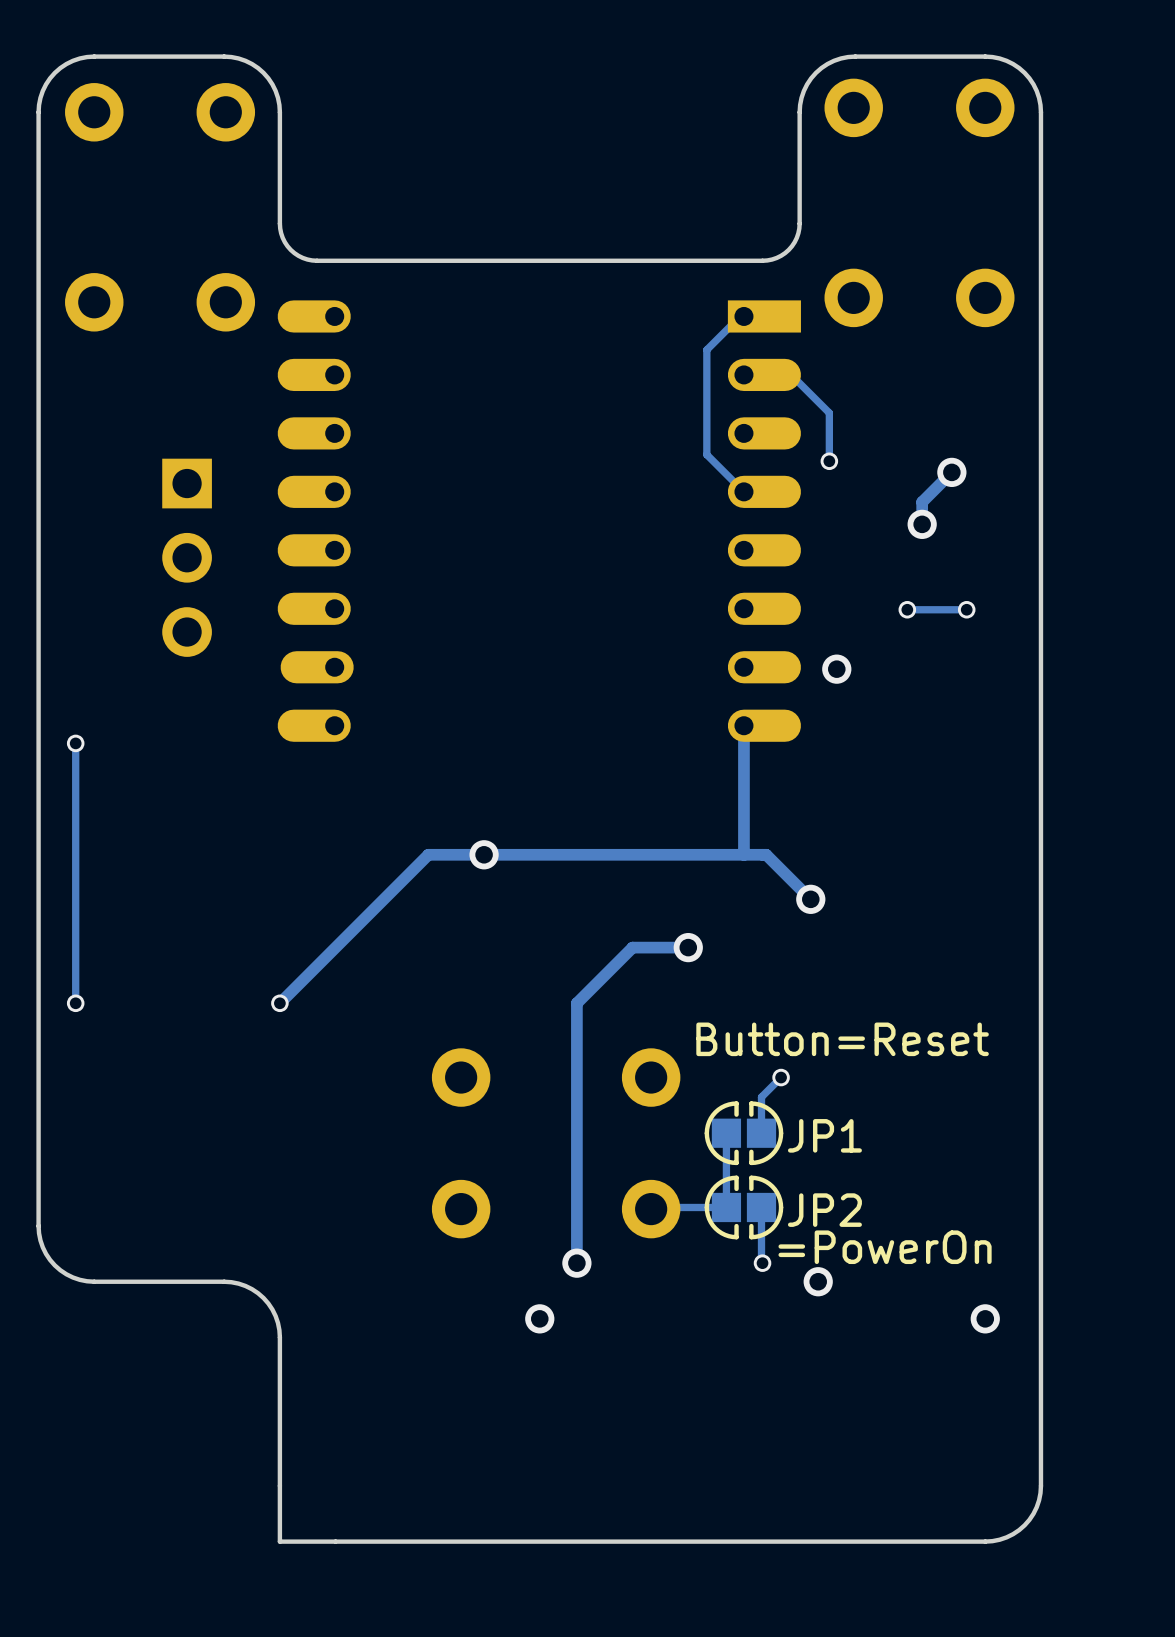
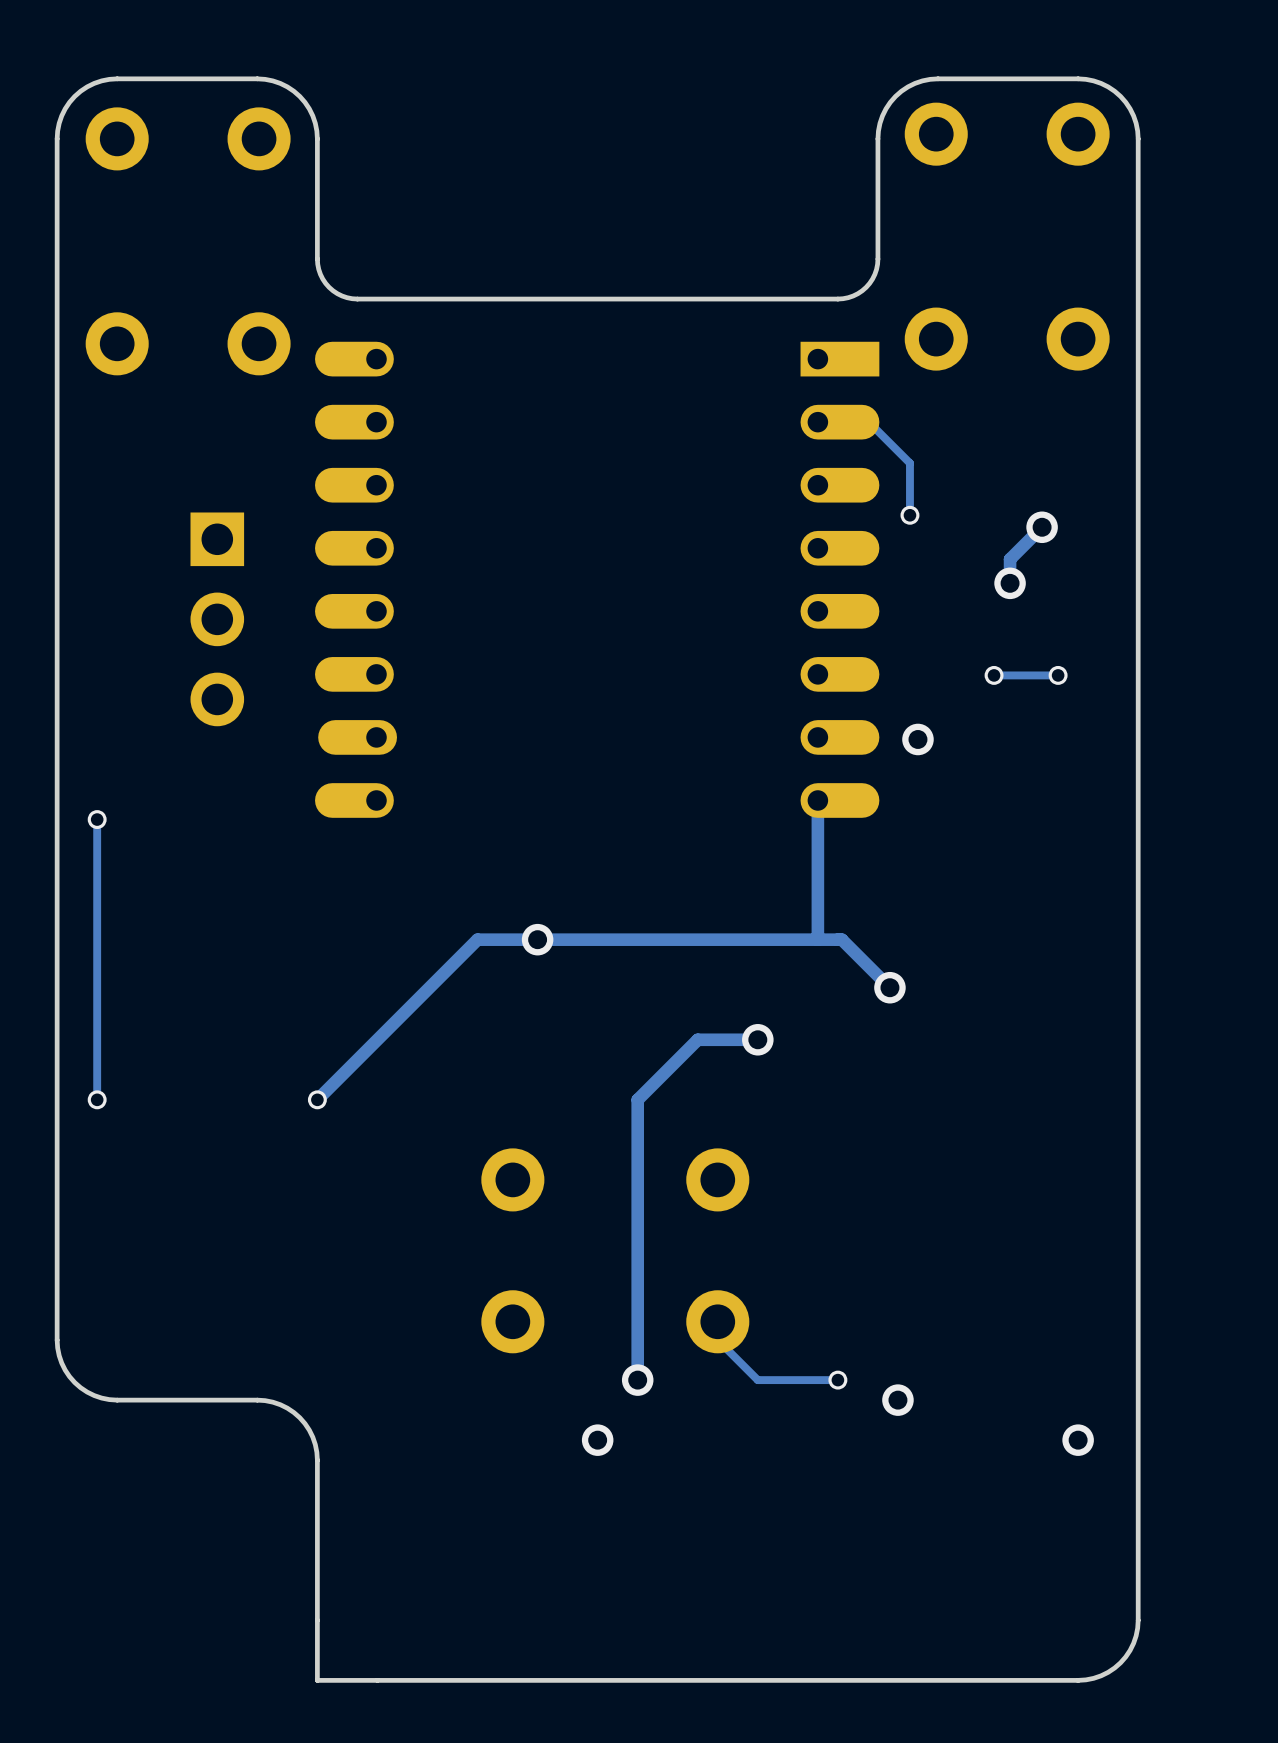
track: (743, 316) (740, 316) (706, 349) (706, 454) (743, 491) -> none
track: (781, 1077) (761, 1097) (761, 1133) -> none
via: (781, 1077) -> none
track: (726, 1133) (726, 1207) (652, 1207) (651, 1209) -> none
JP1: Button=Reset (743, 1133) -> none
JP2: =PowerOn (743, 1207) -> none
track: (761, 1207) (762, 1263) -> (717, 1321) (717, 1340) (757, 1380) (837, 1380)

